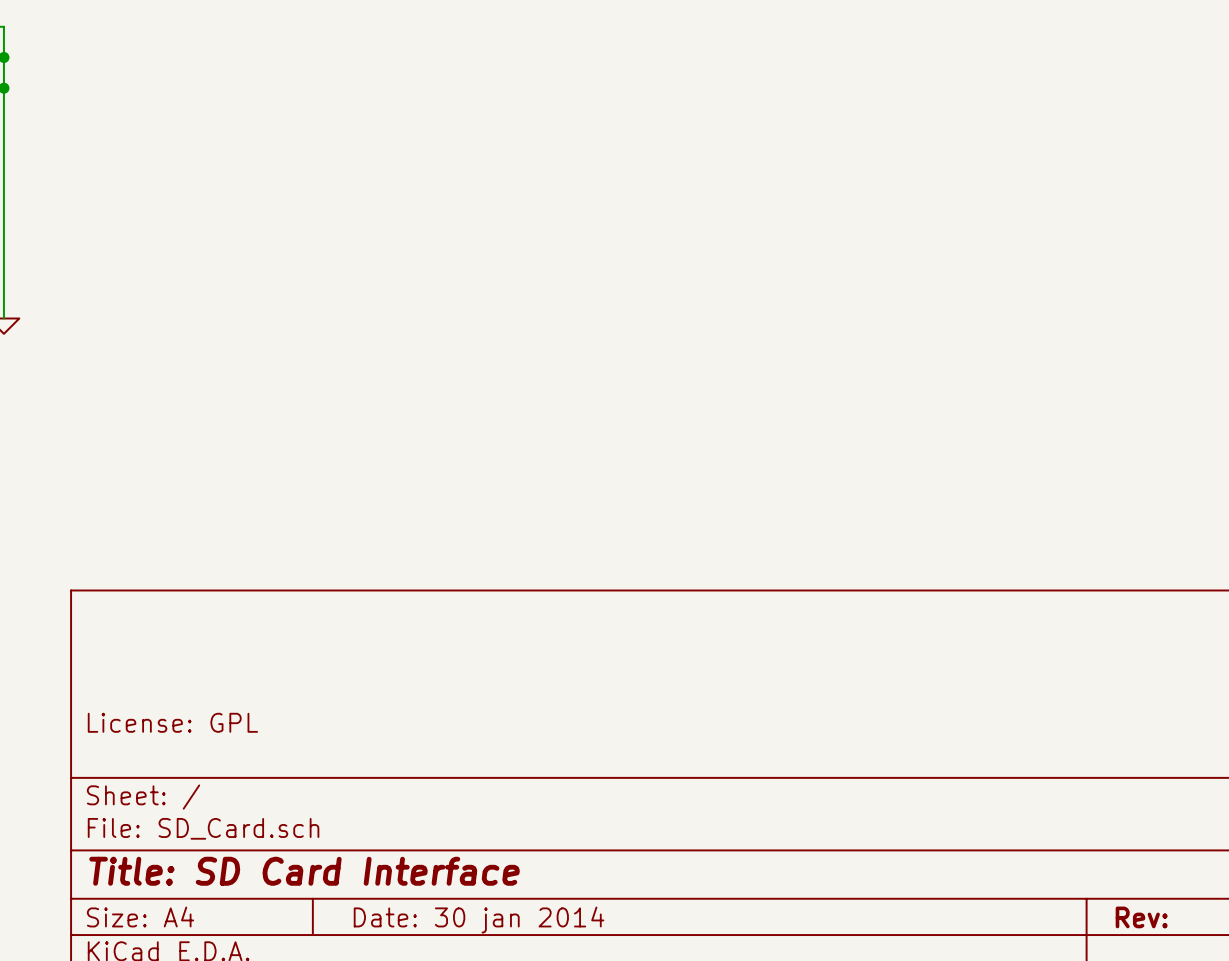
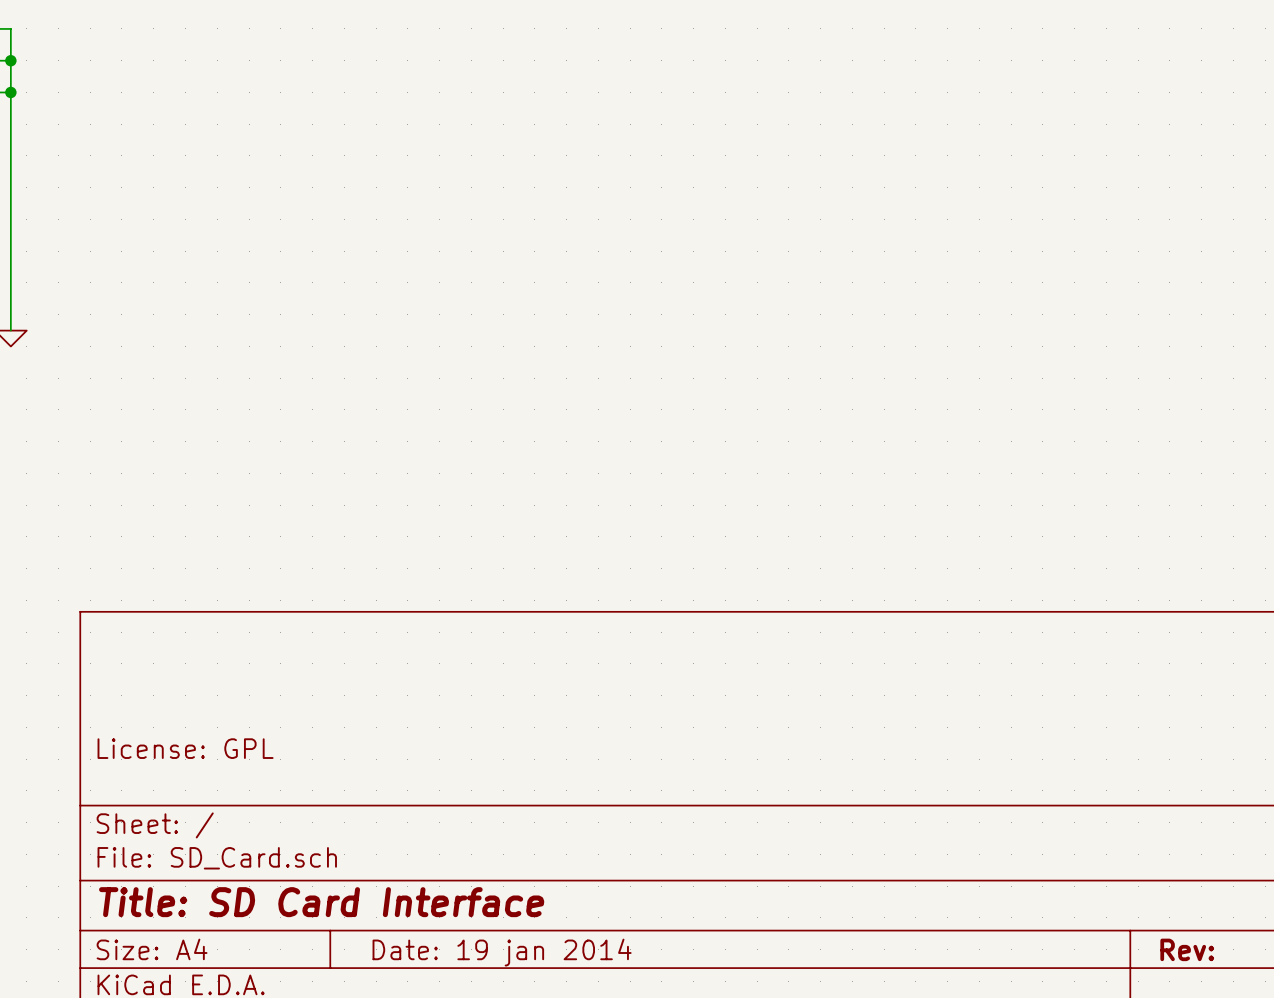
title block: Date: 30 jan 2014 (479, 920) -> Date: 19 jan 2014 (502, 952)

